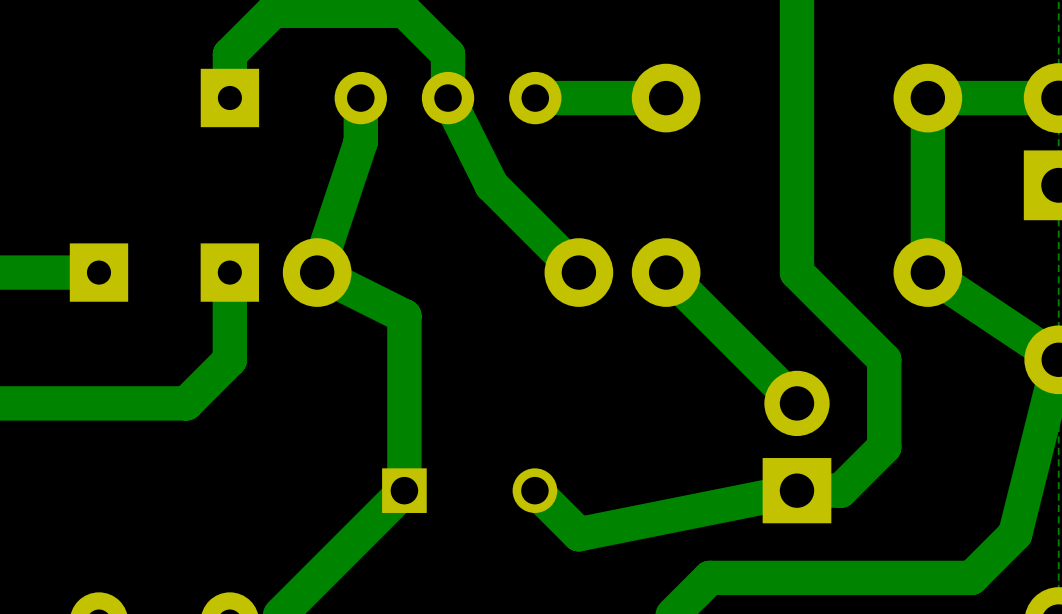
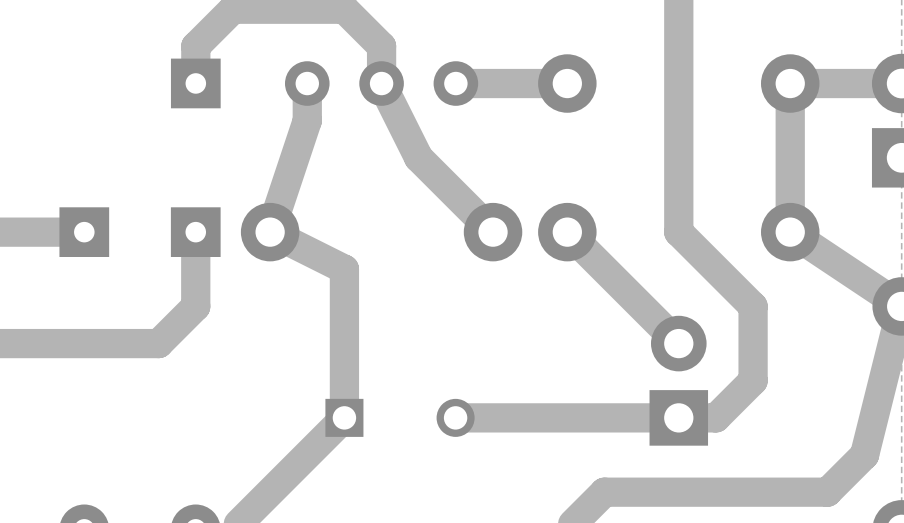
track: (796, 490) (578, 534) (535, 490) -> (678, 417) (455, 417)

